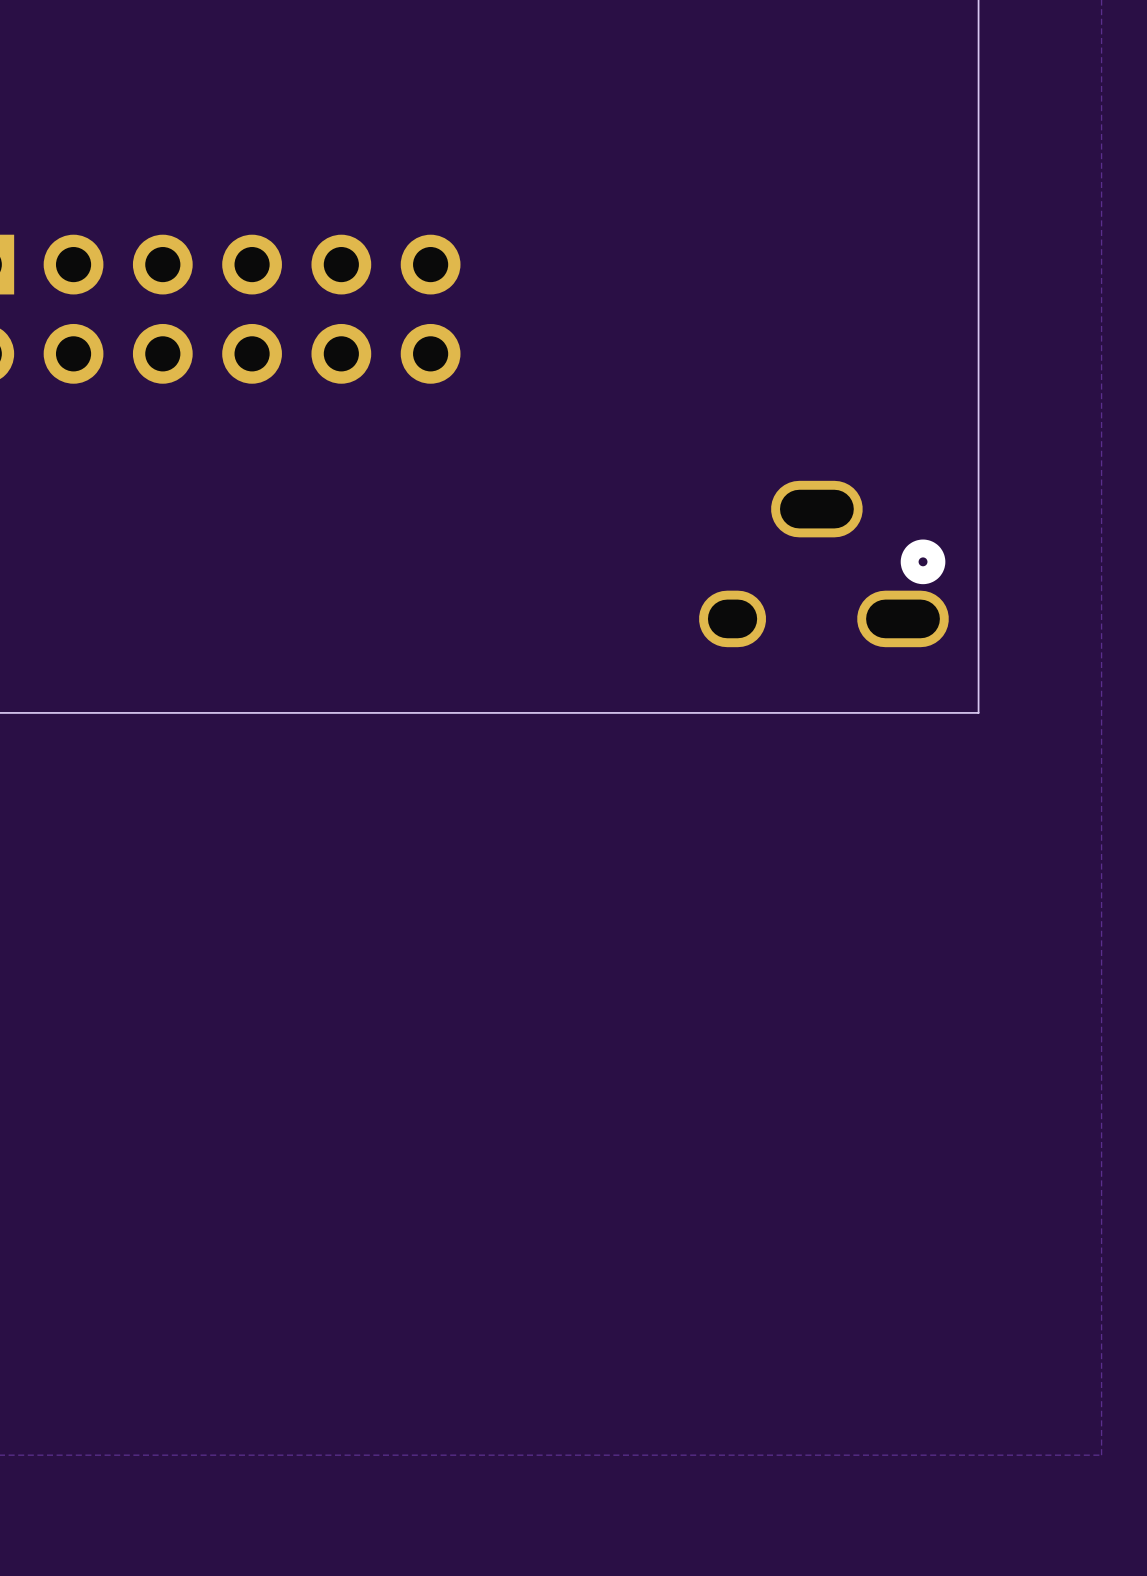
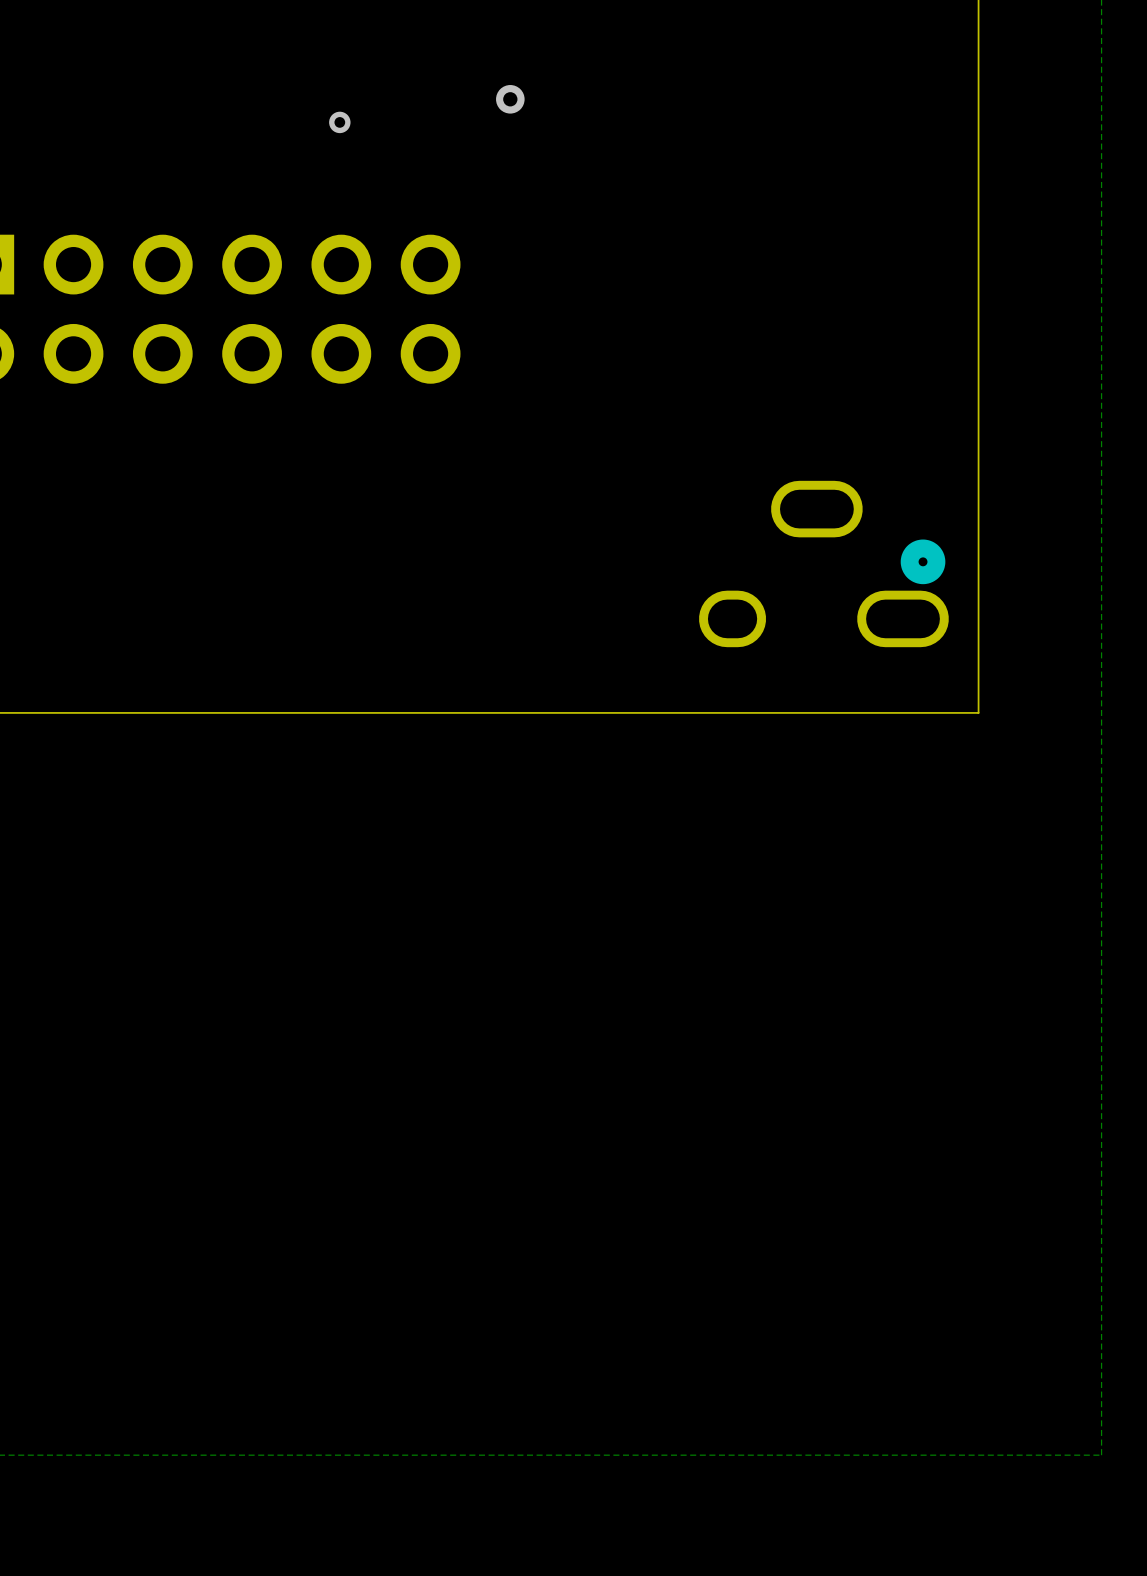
via: none -> (510, 99)
via: none -> (339, 122)

